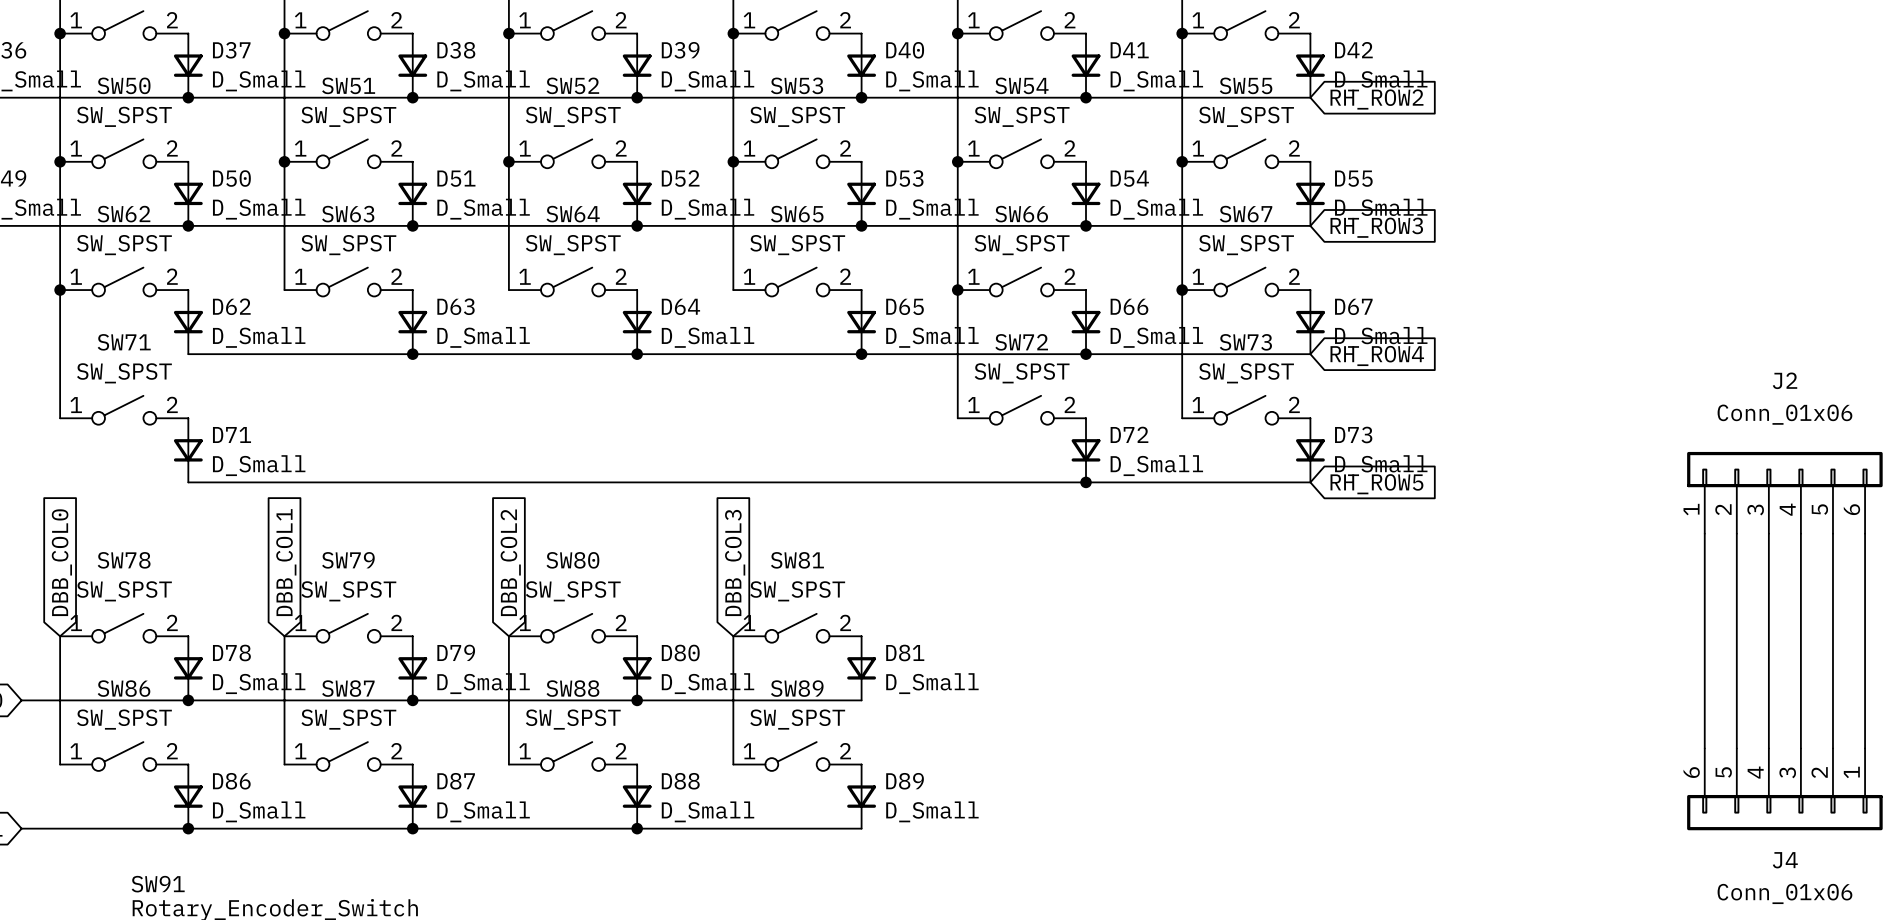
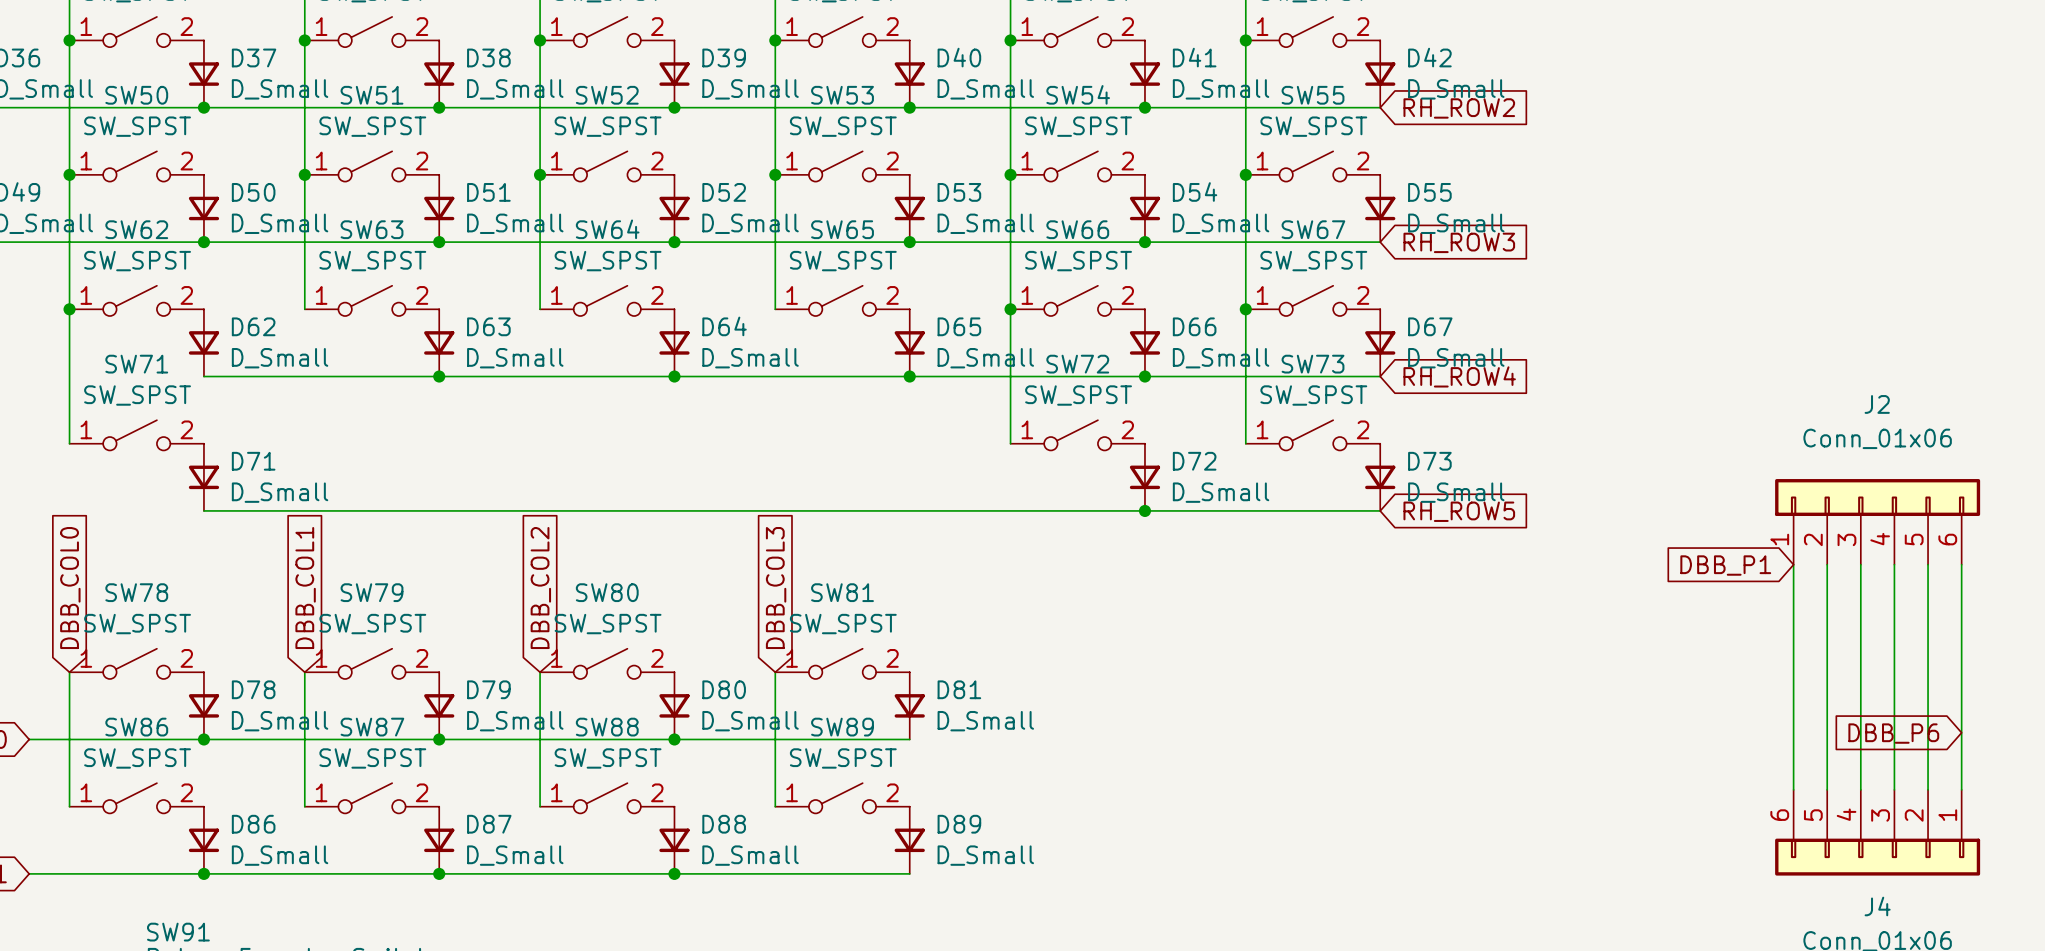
global label: none -> DBB_P1 (1725, 565)
global label: none -> DBB_P6 (1893, 733)

